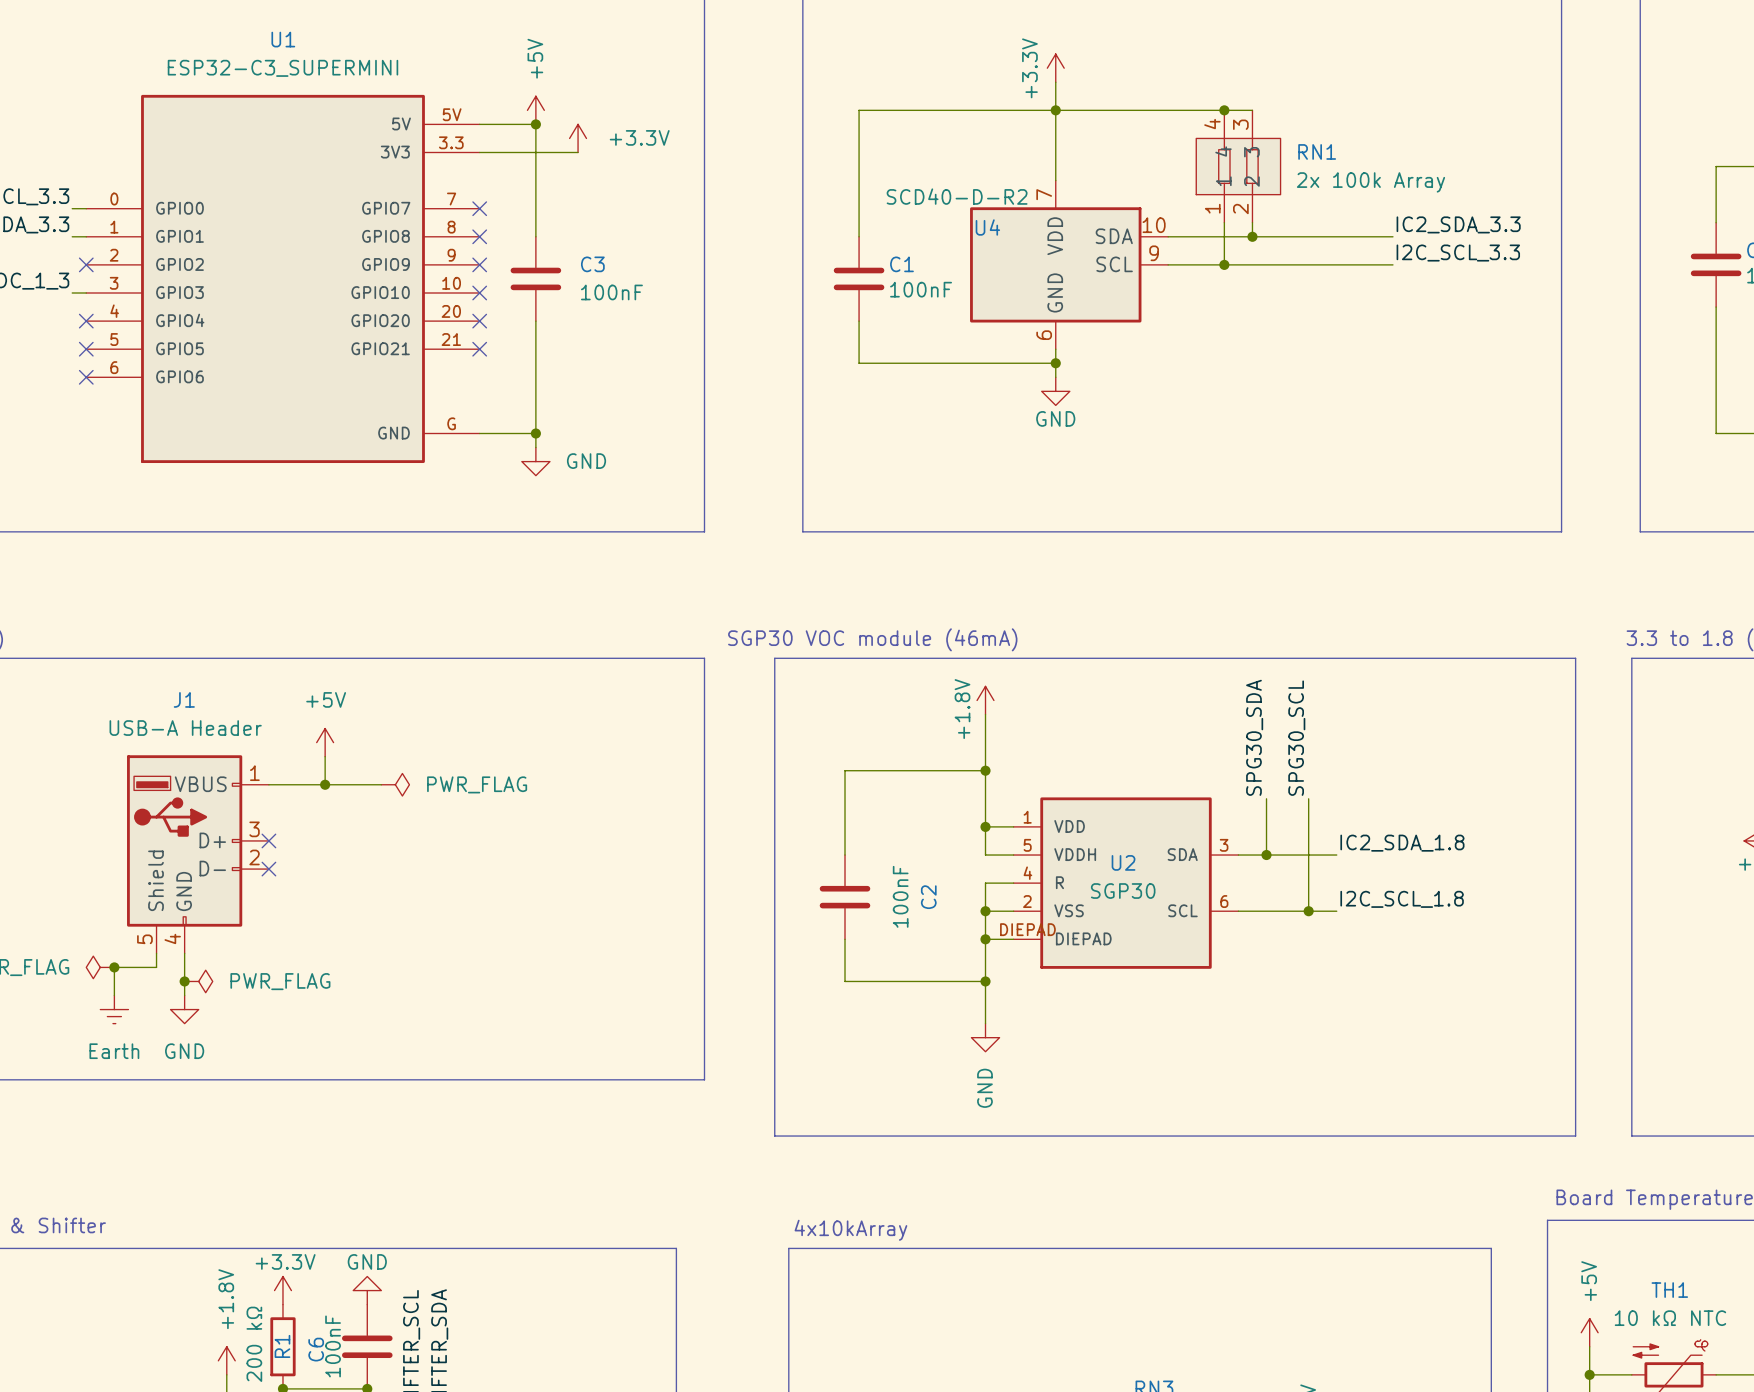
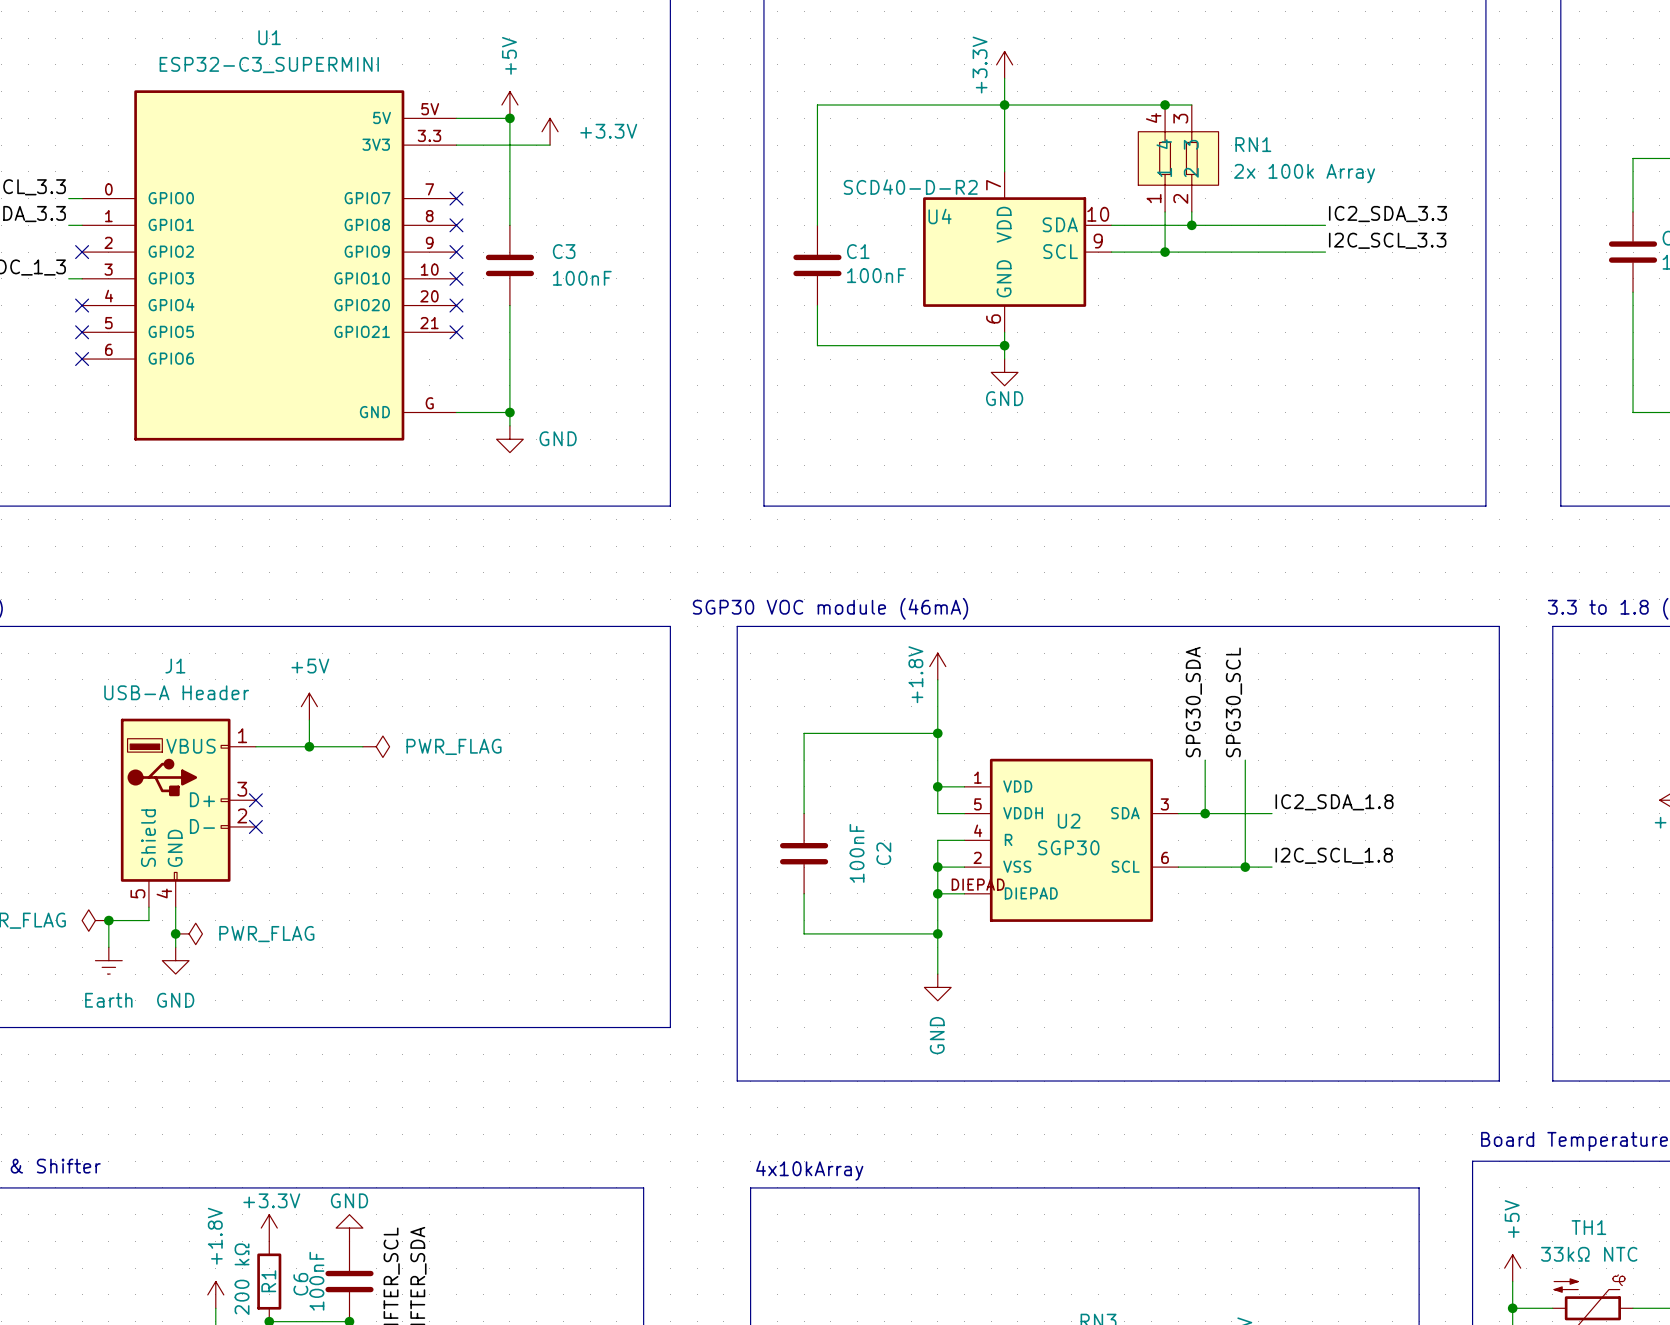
TH1 value: 10 kΩ NTC (1670, 1318) -> 33kΩ NTC (1589, 1254)

